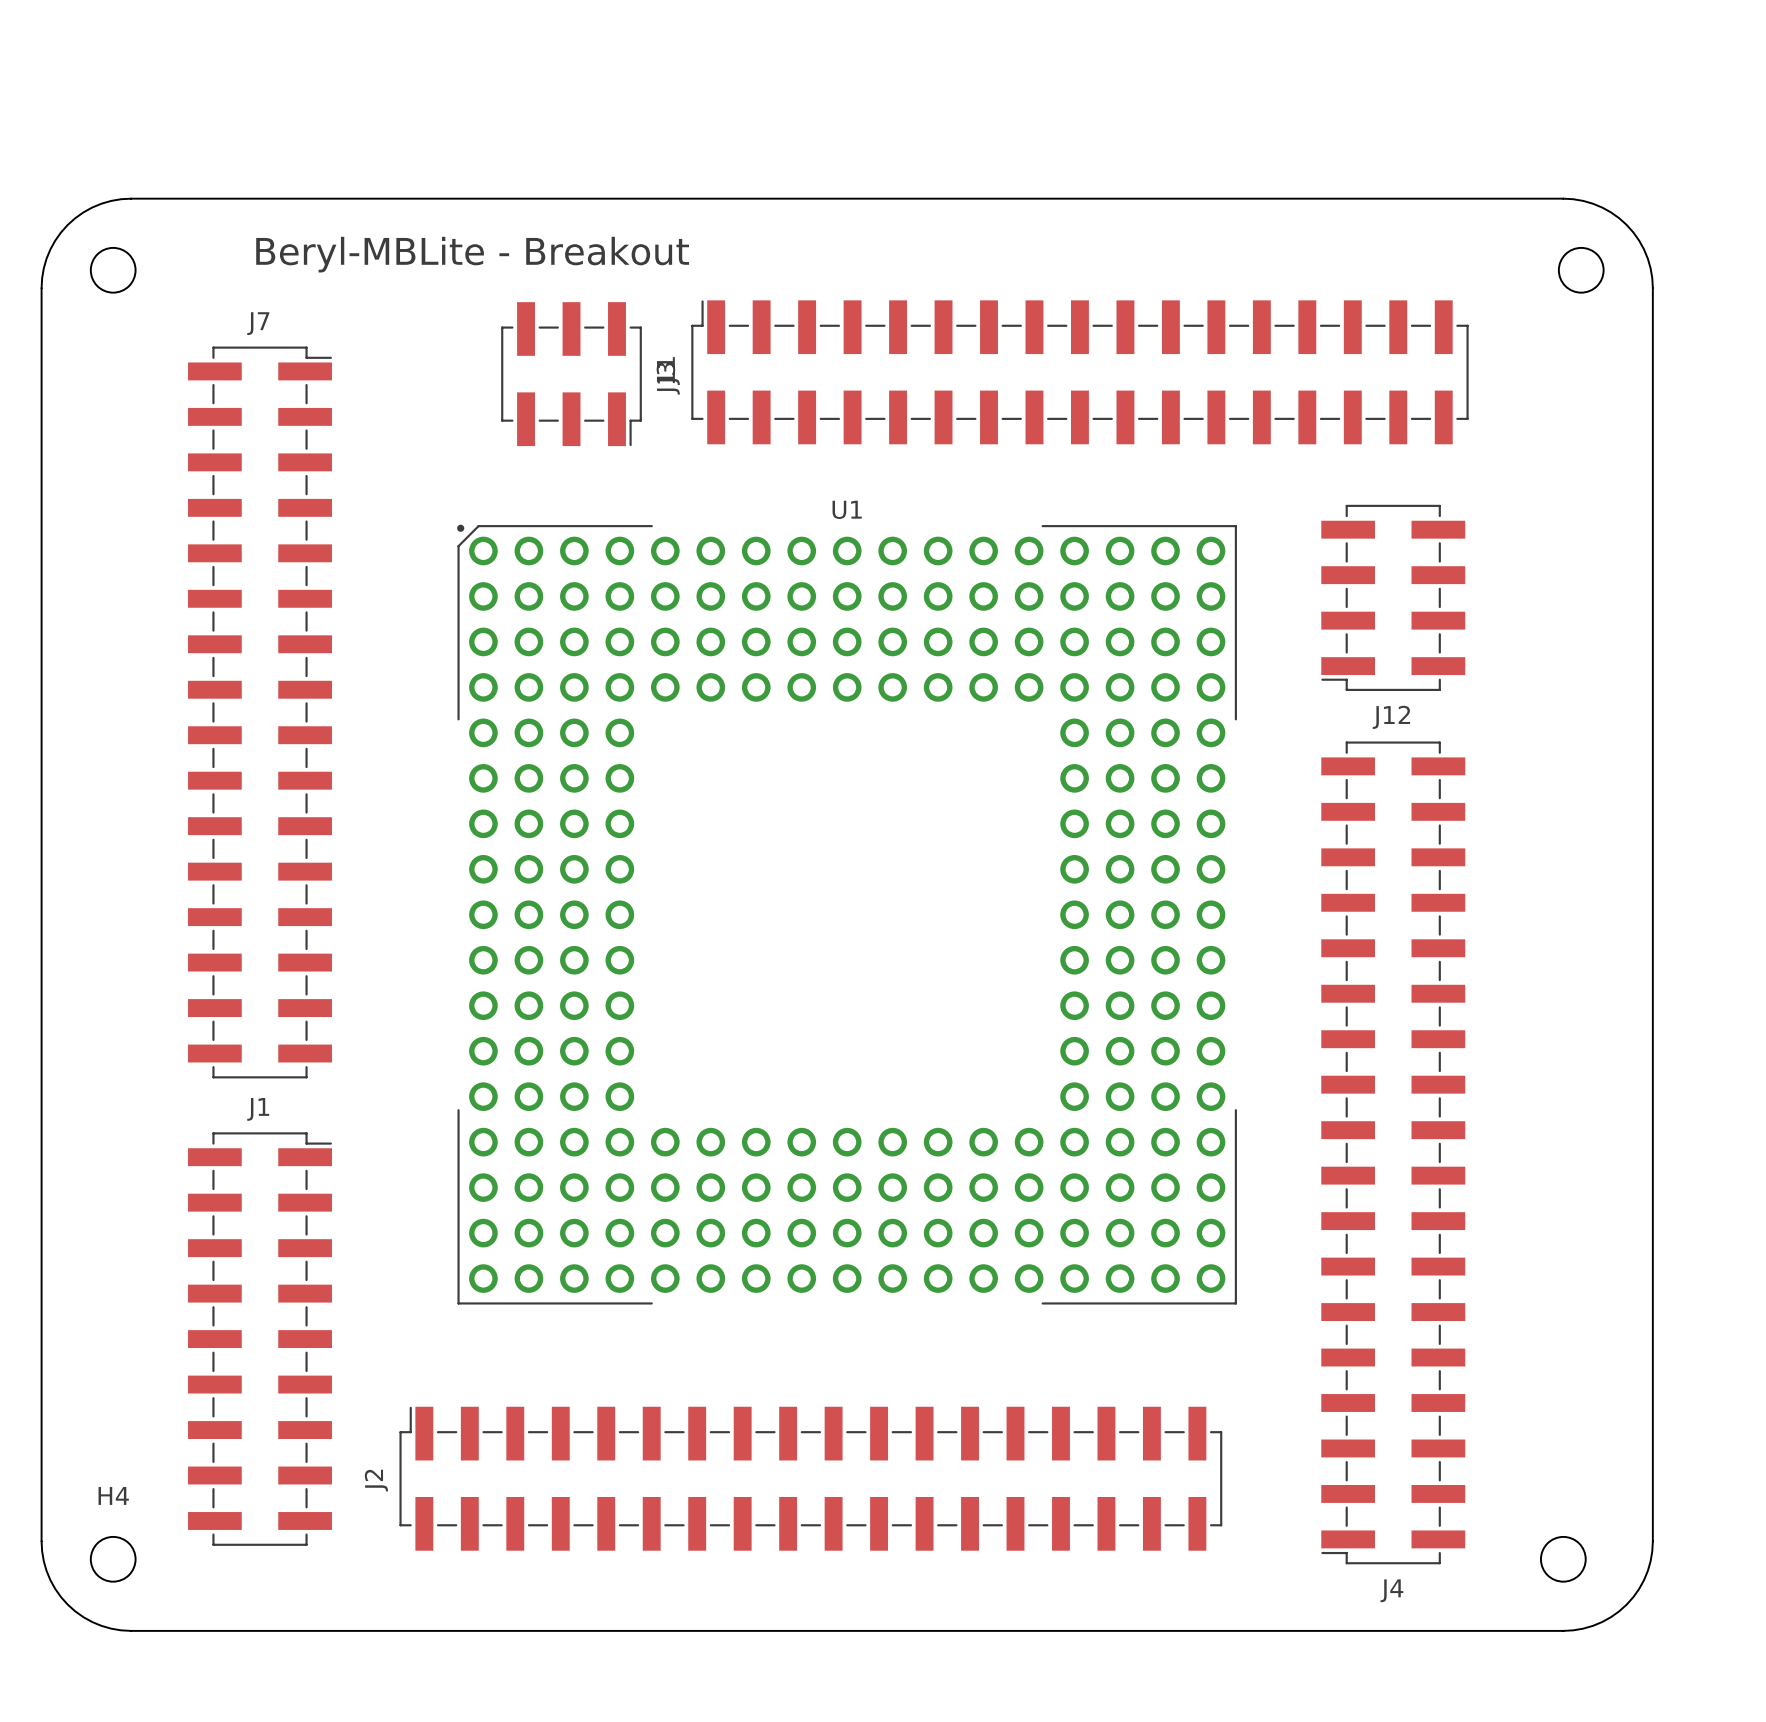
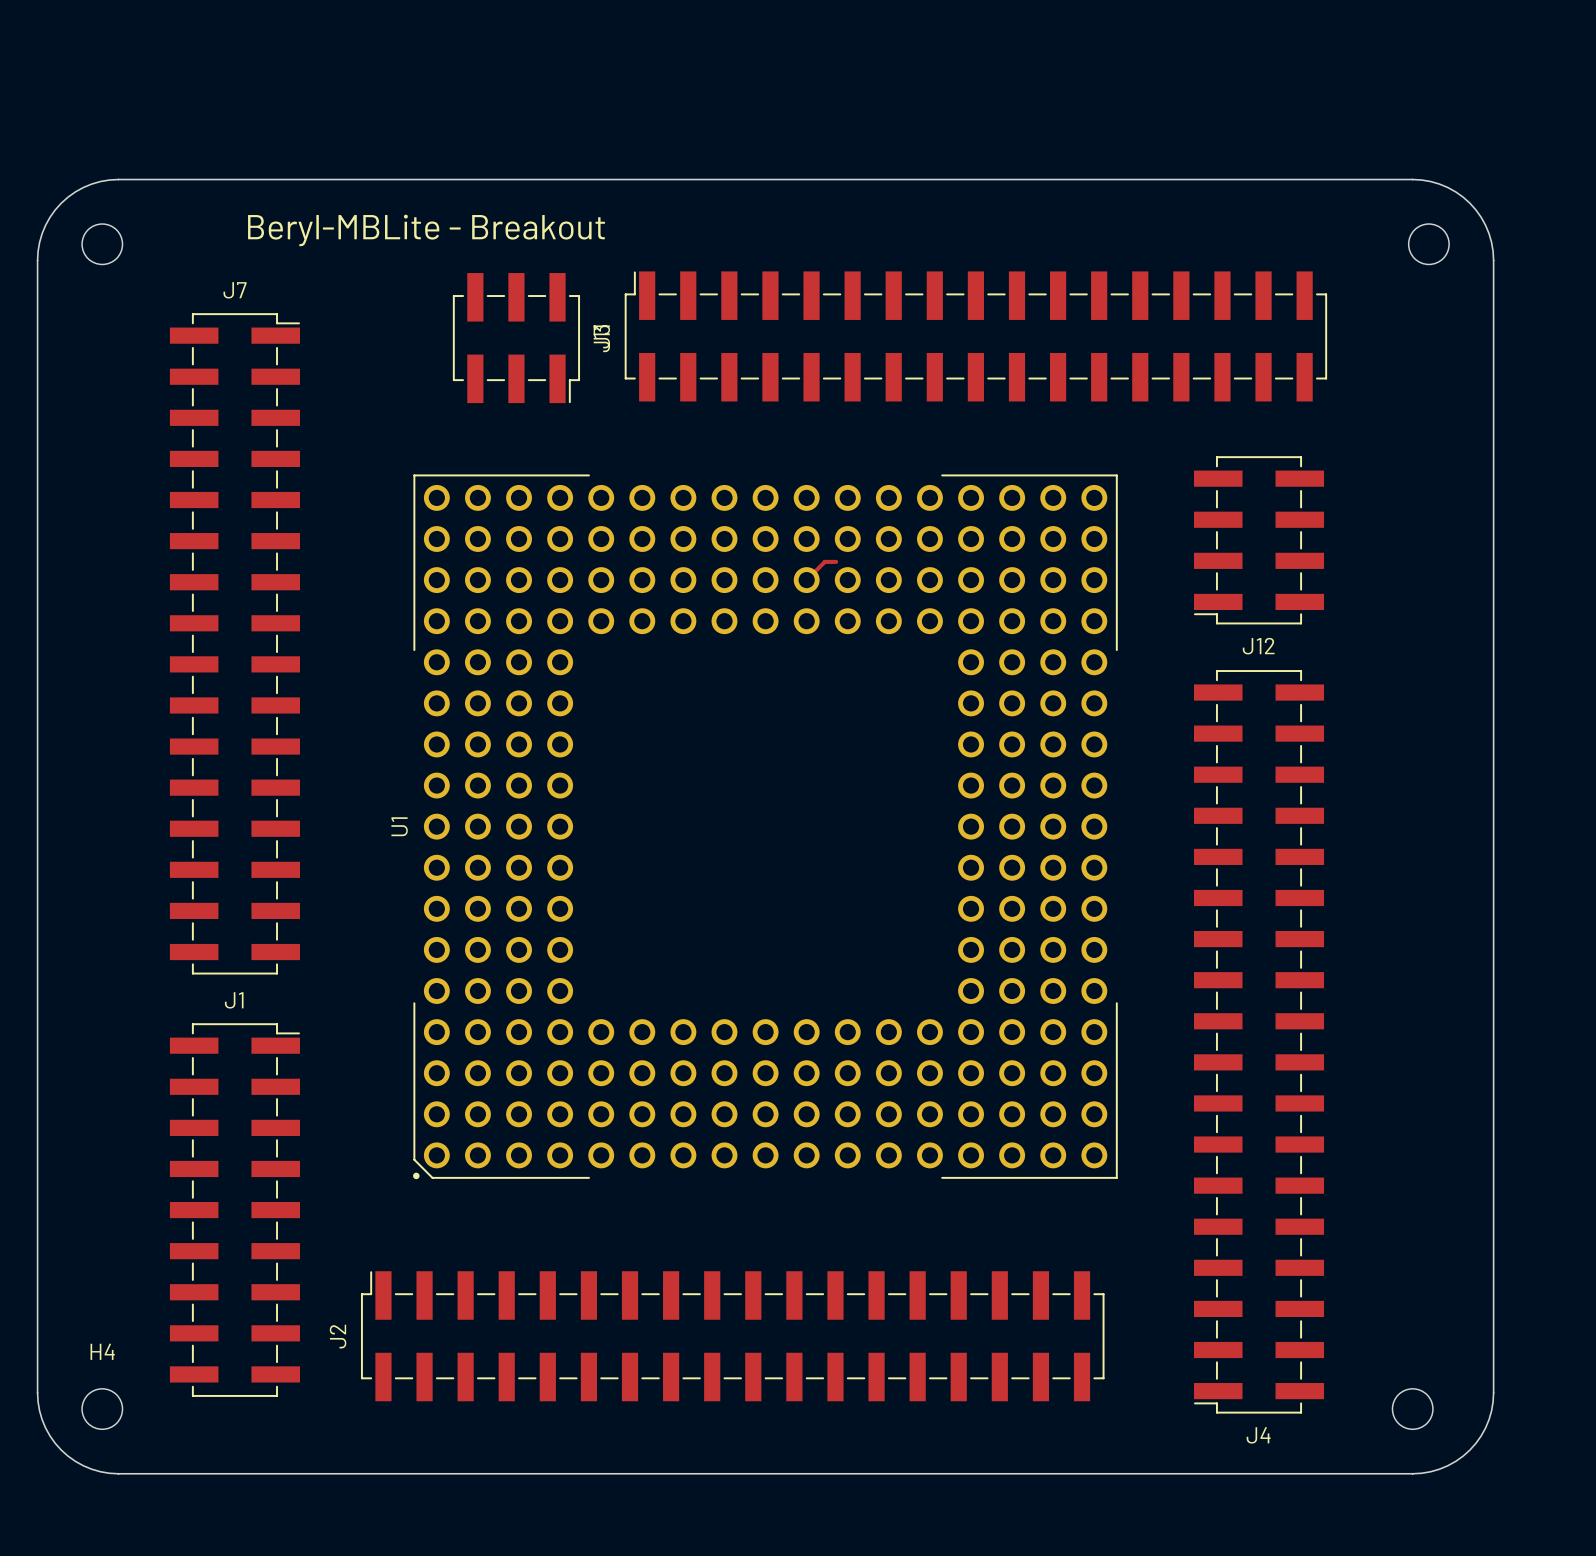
track: none -> (836, 561) (824, 561) (806, 580)
U1 rotation: 0° (847, 914) -> 90° counterclockwise (765, 826)

